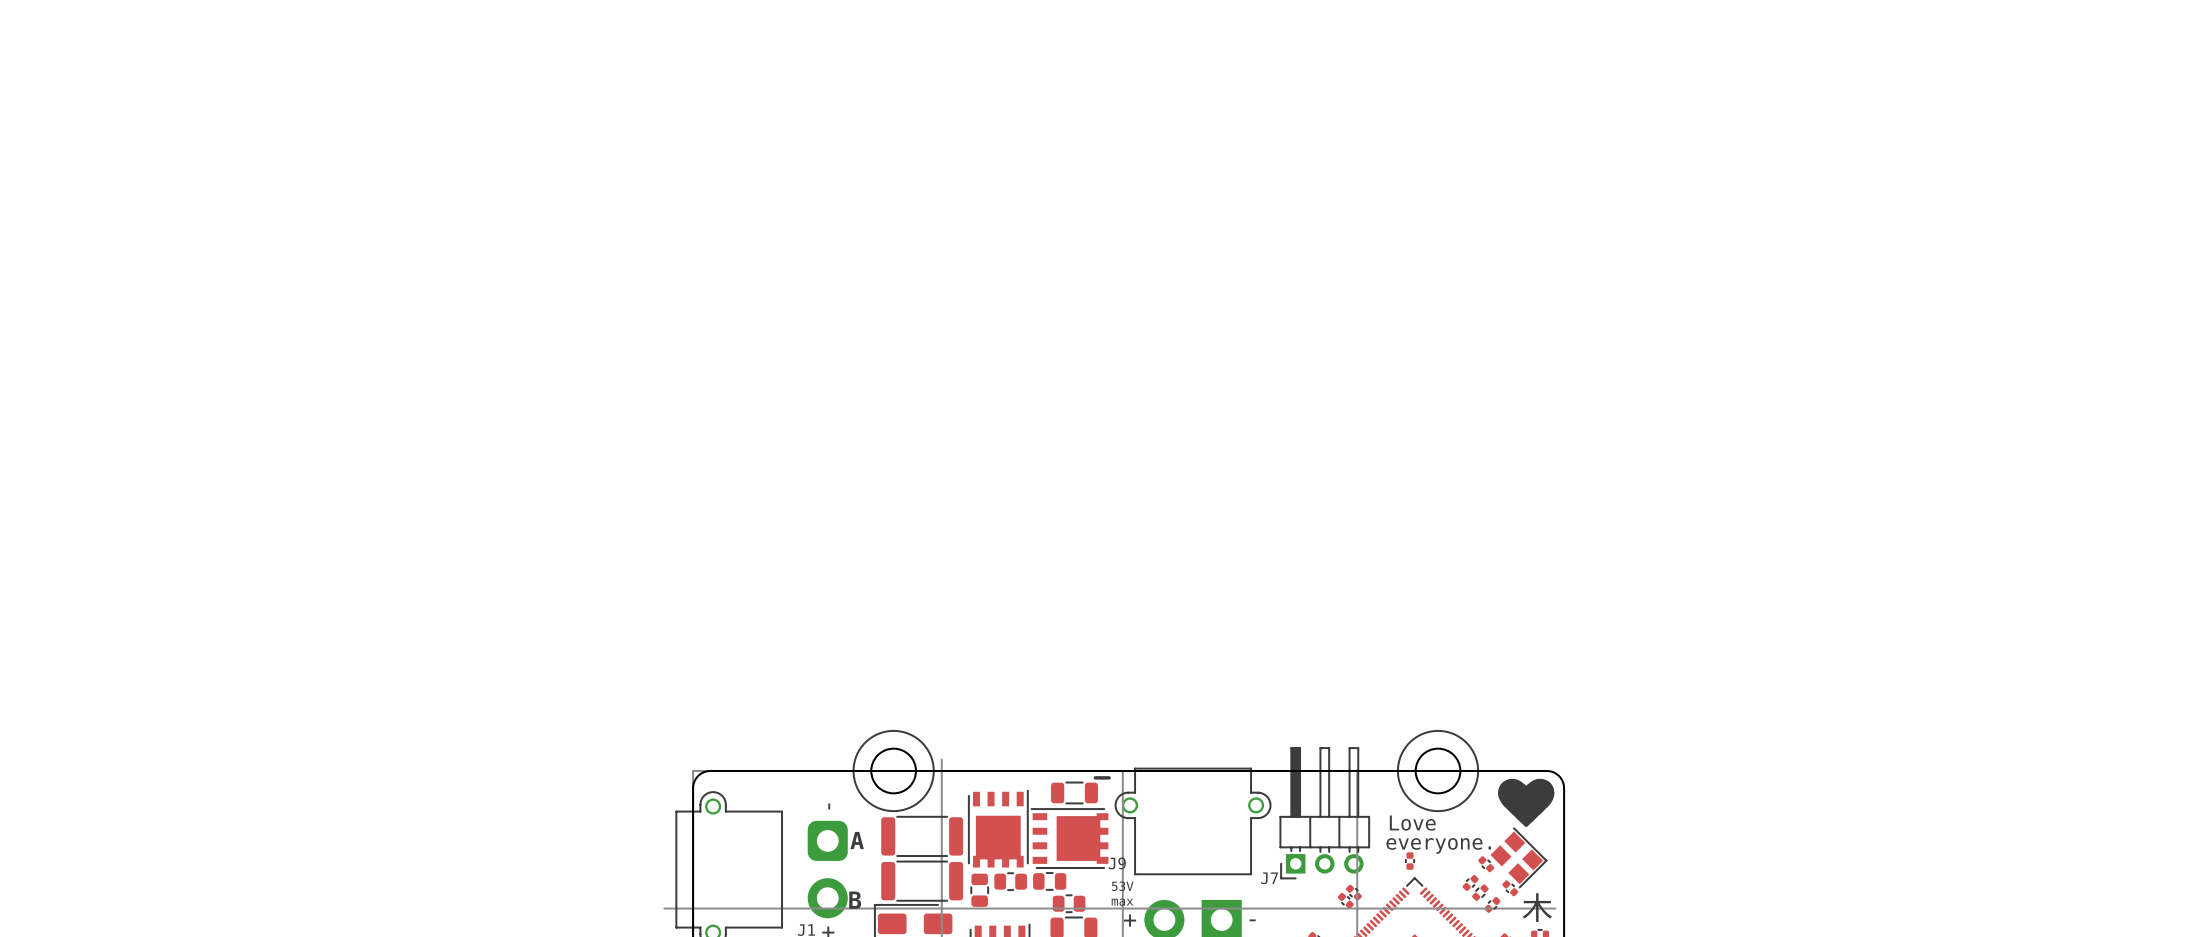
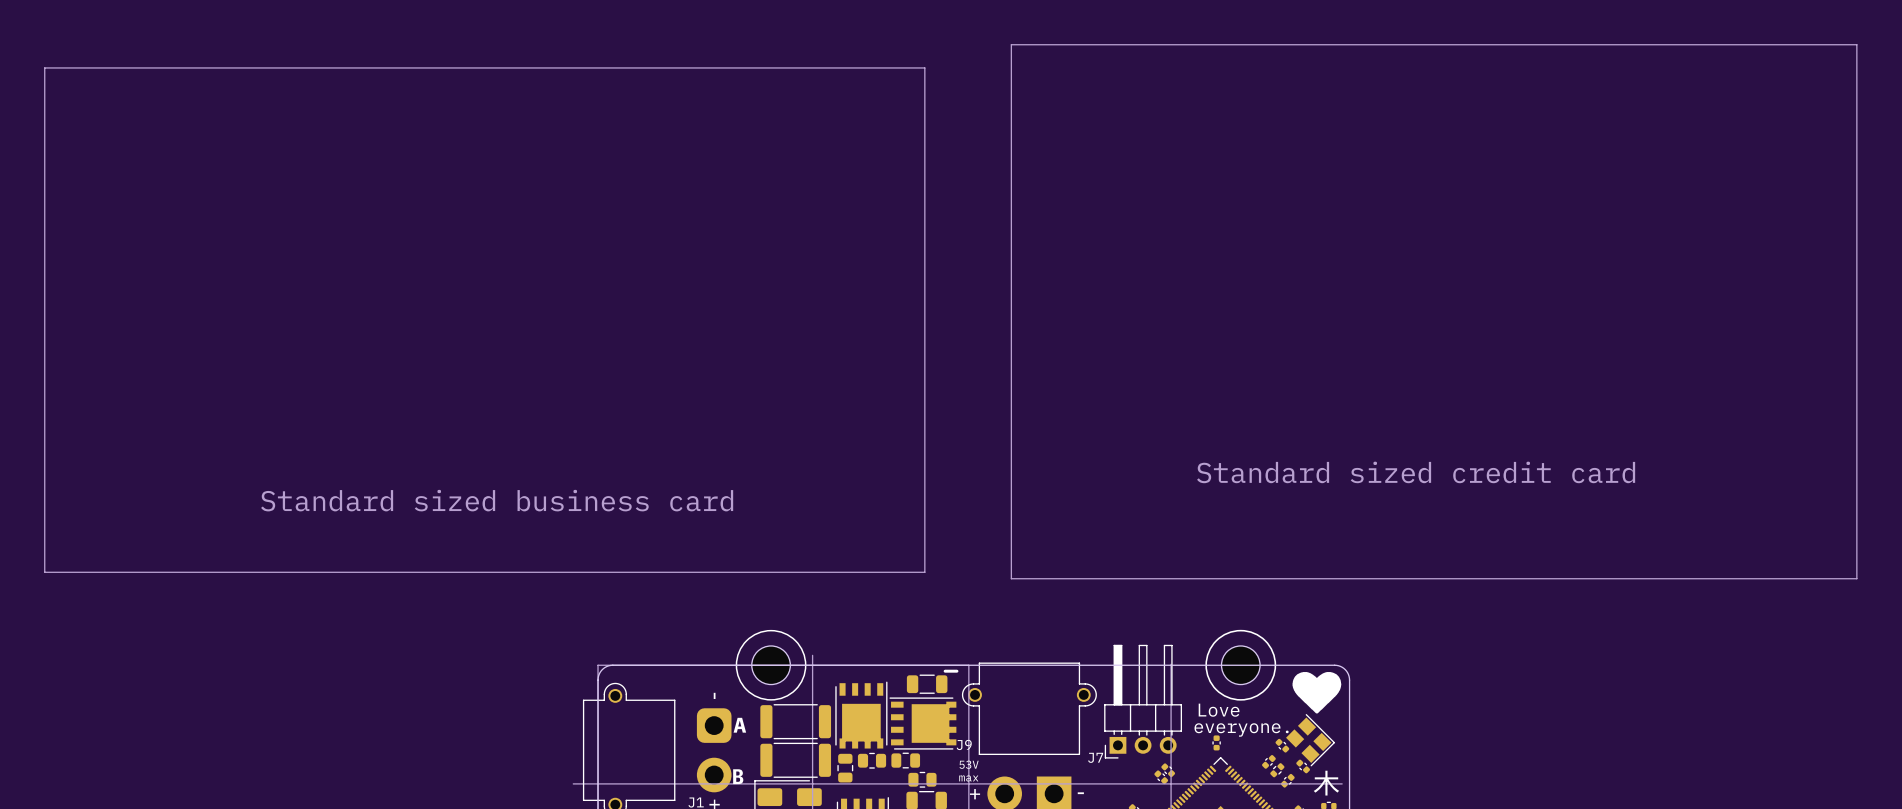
line: none -> (1011, 44) (1856, 44) (1856, 578) (1011, 578) (1011, 44)
line: none -> (44, 67) (924, 67) (924, 572) (44, 572) (44, 67)
text: none -> Standard sized credit card (1416, 472)
text: none -> Standard sized business card (497, 500)

